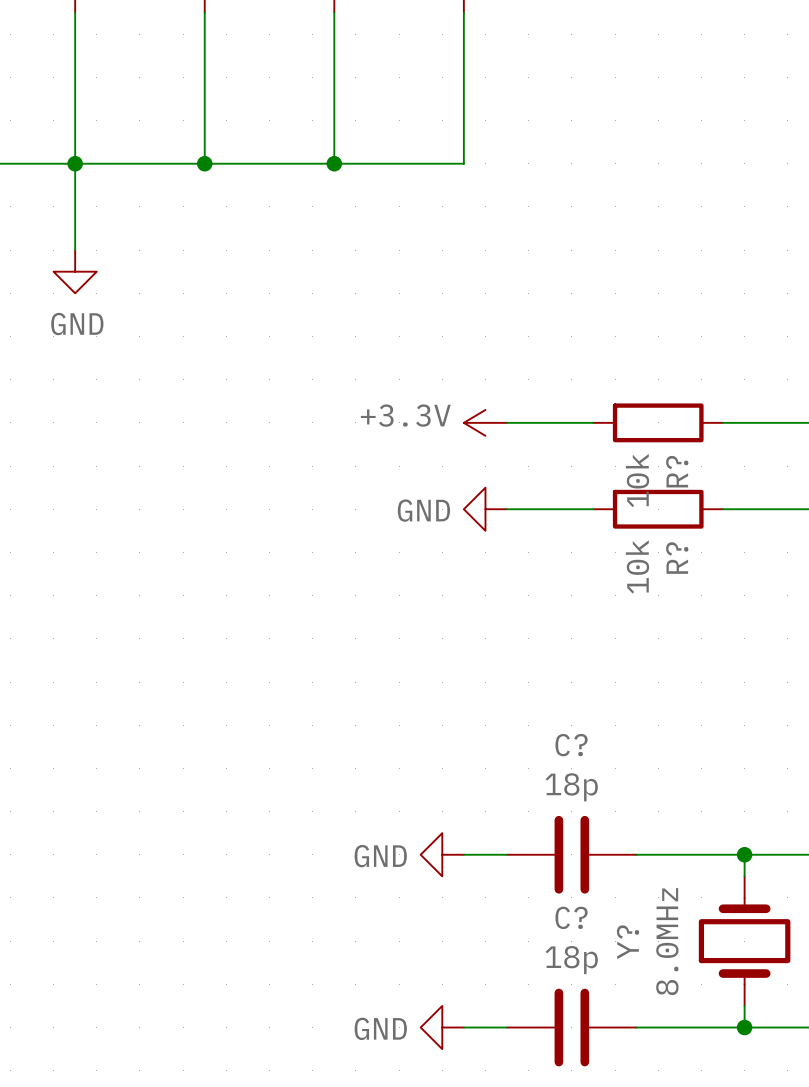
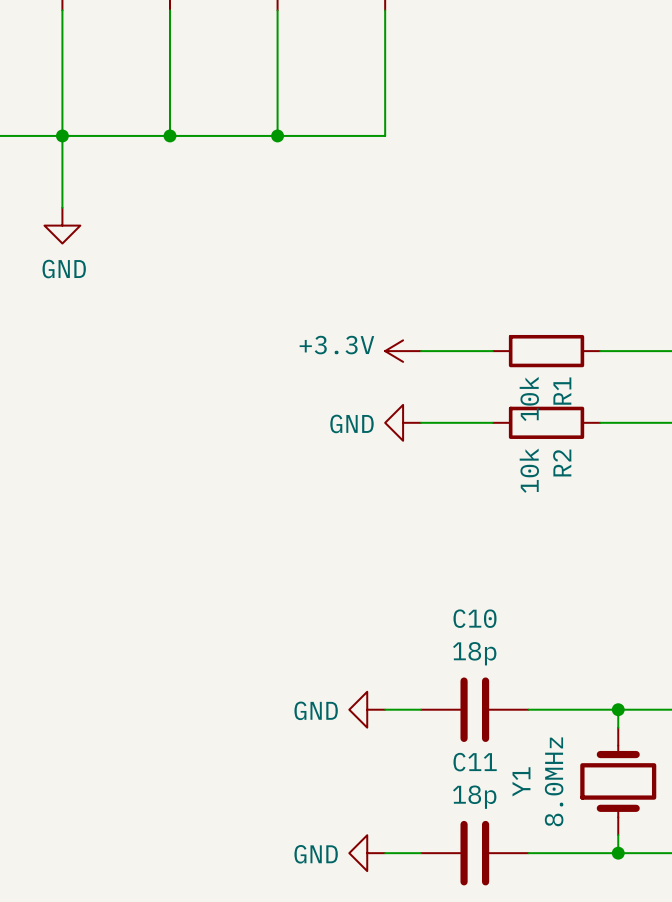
R? name: R? (677, 471) -> R1 (562, 391)
R? name: R? (677, 558) -> R2 (562, 463)
C? name: C? (571, 745) -> C10 (474, 618)
C? name: C? (571, 917) -> C11 (475, 762)
Y? name: Y? (628, 942) -> Y1 (521, 781)

